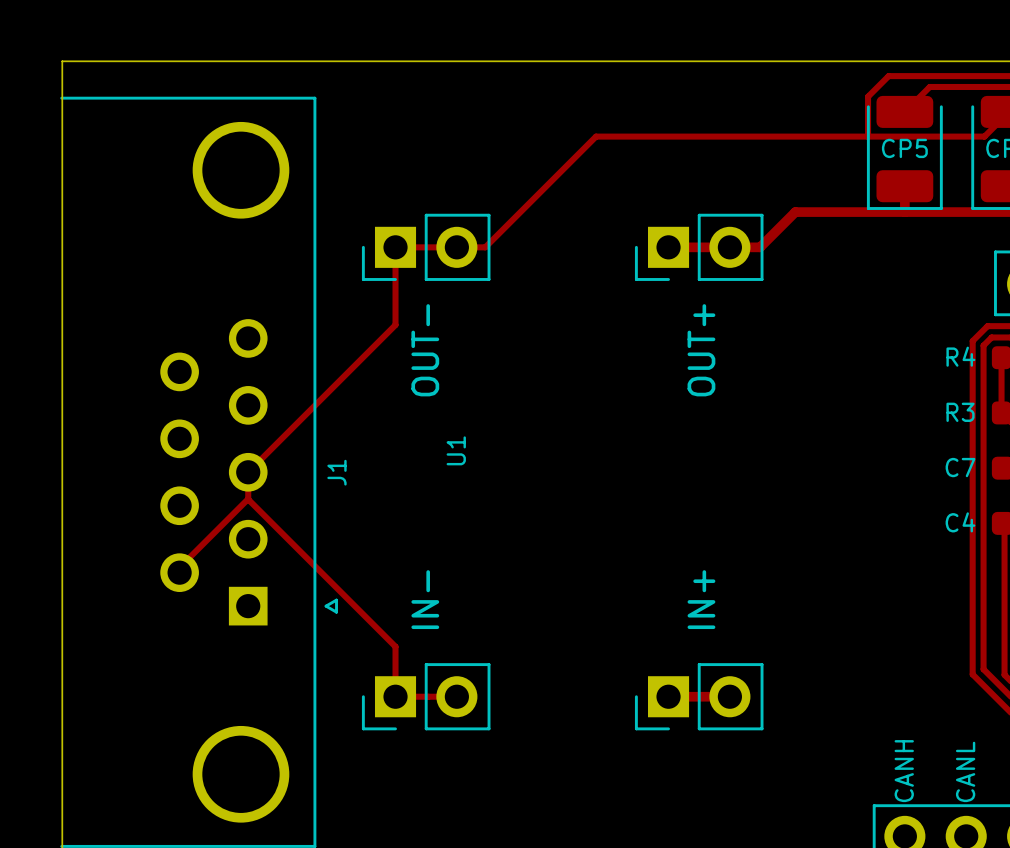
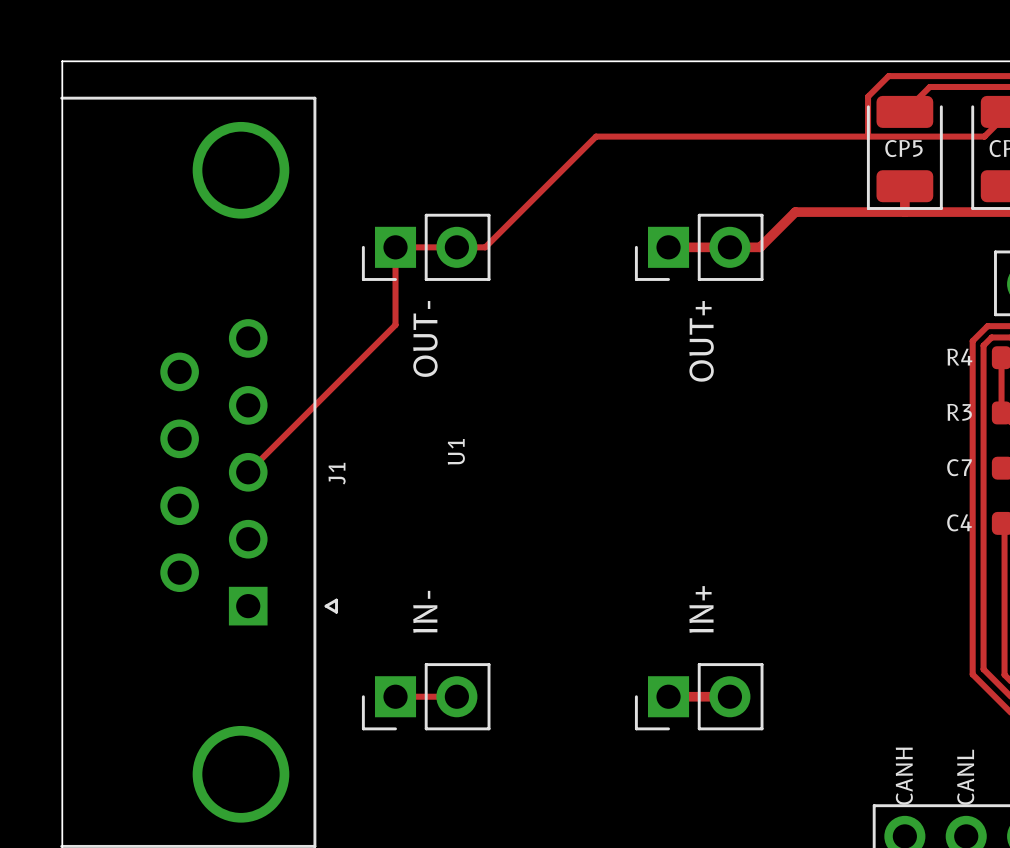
track: (248, 472) (248, 498) (179, 567) (179, 572) -> none
track: (248, 499) (395, 646) (395, 696) -> none

